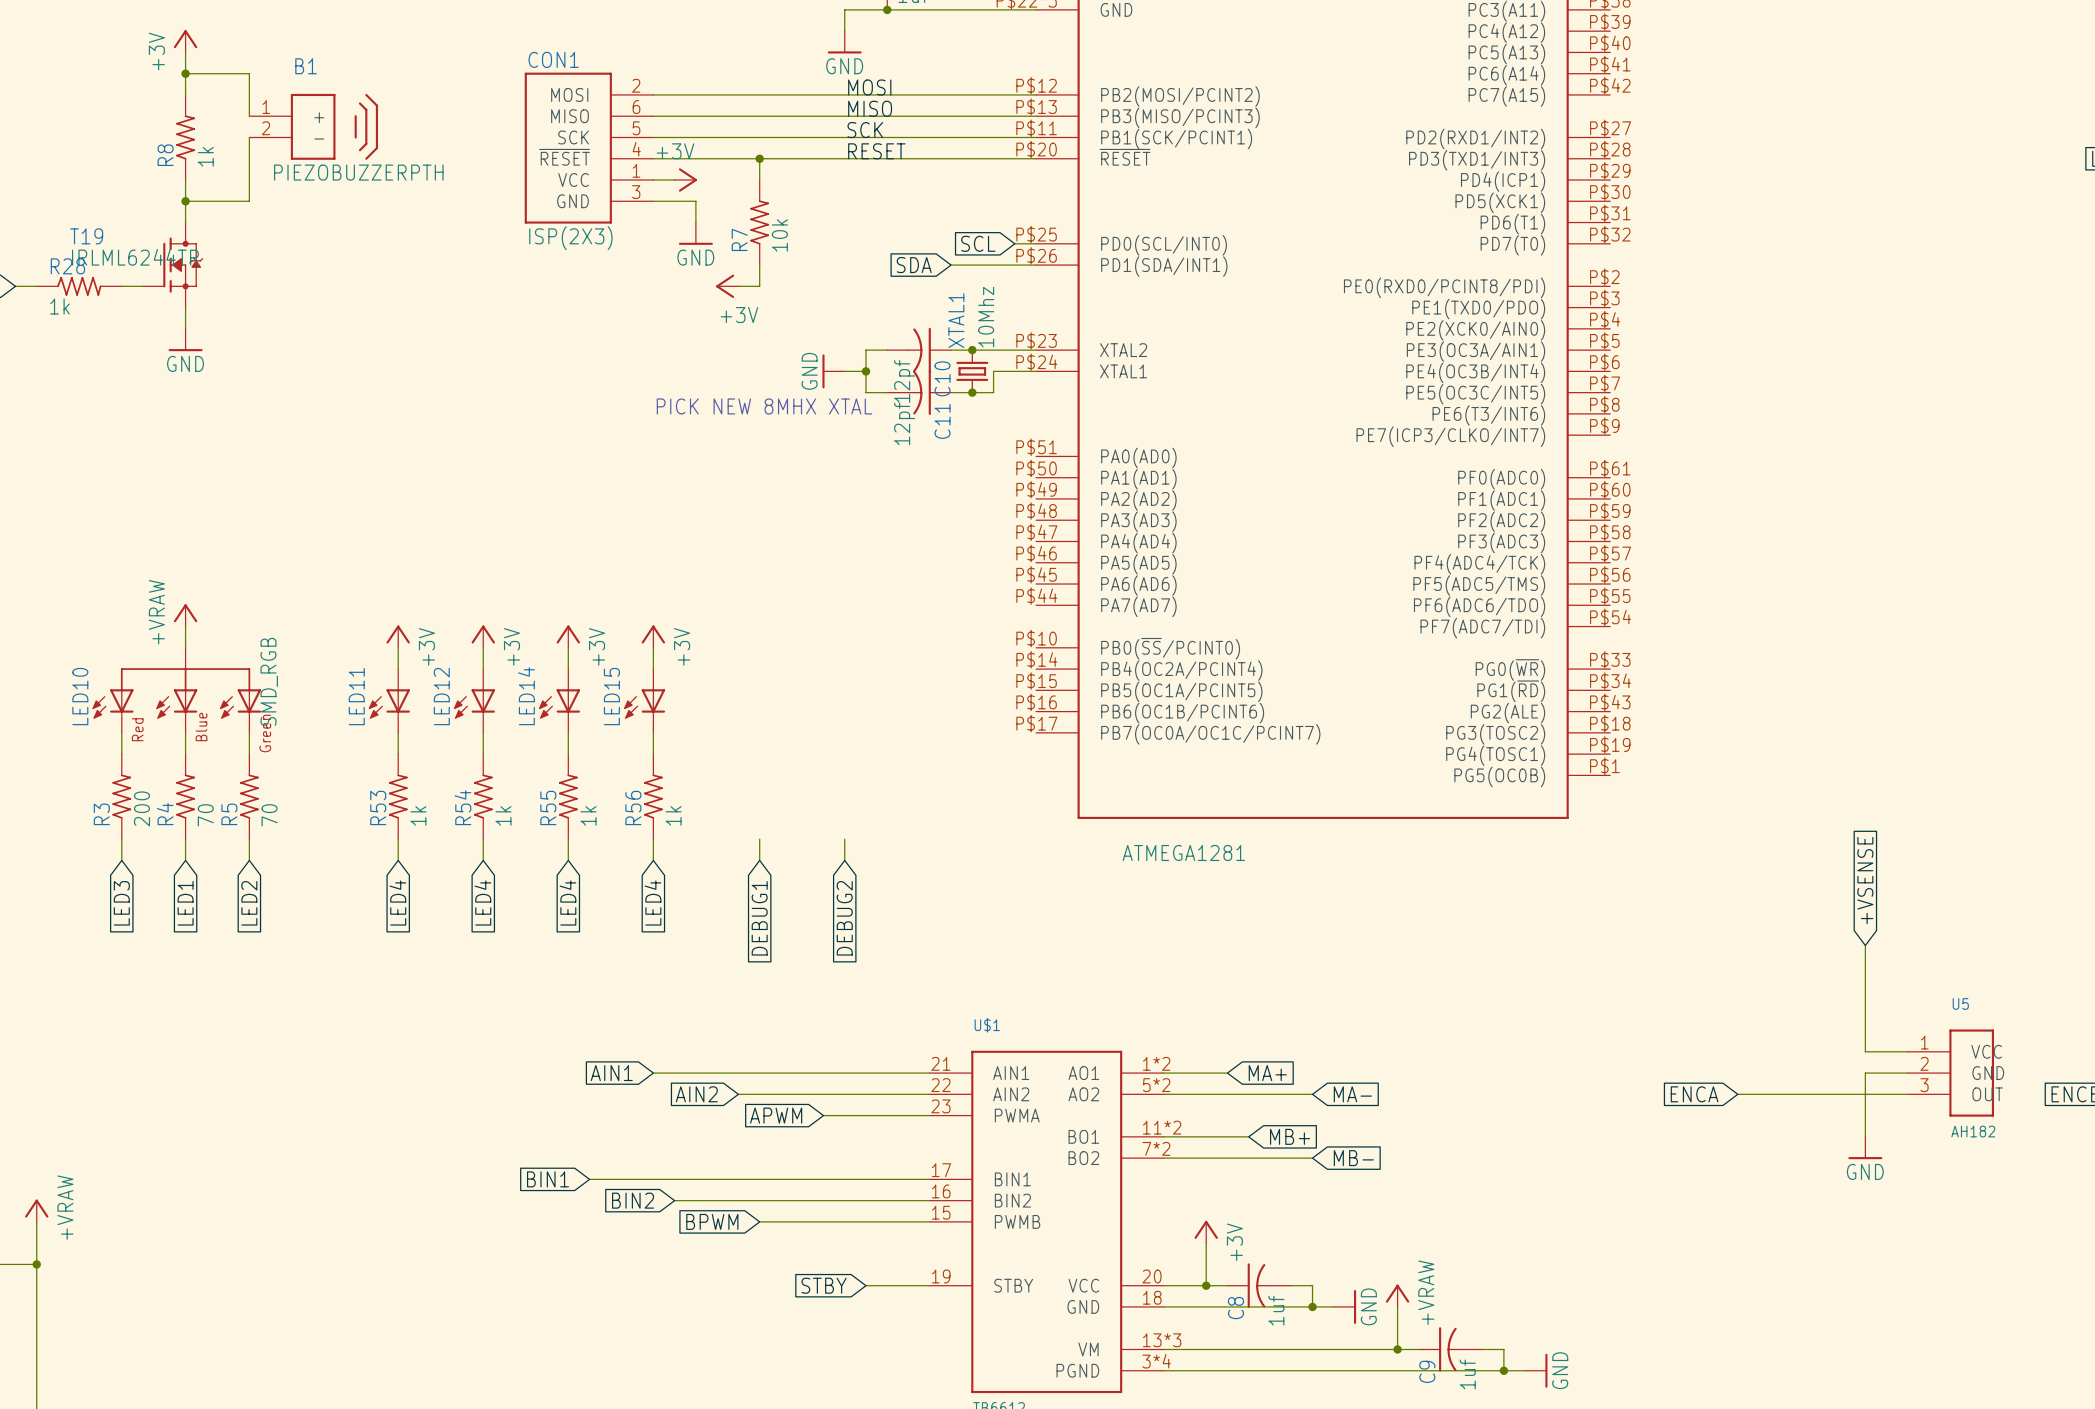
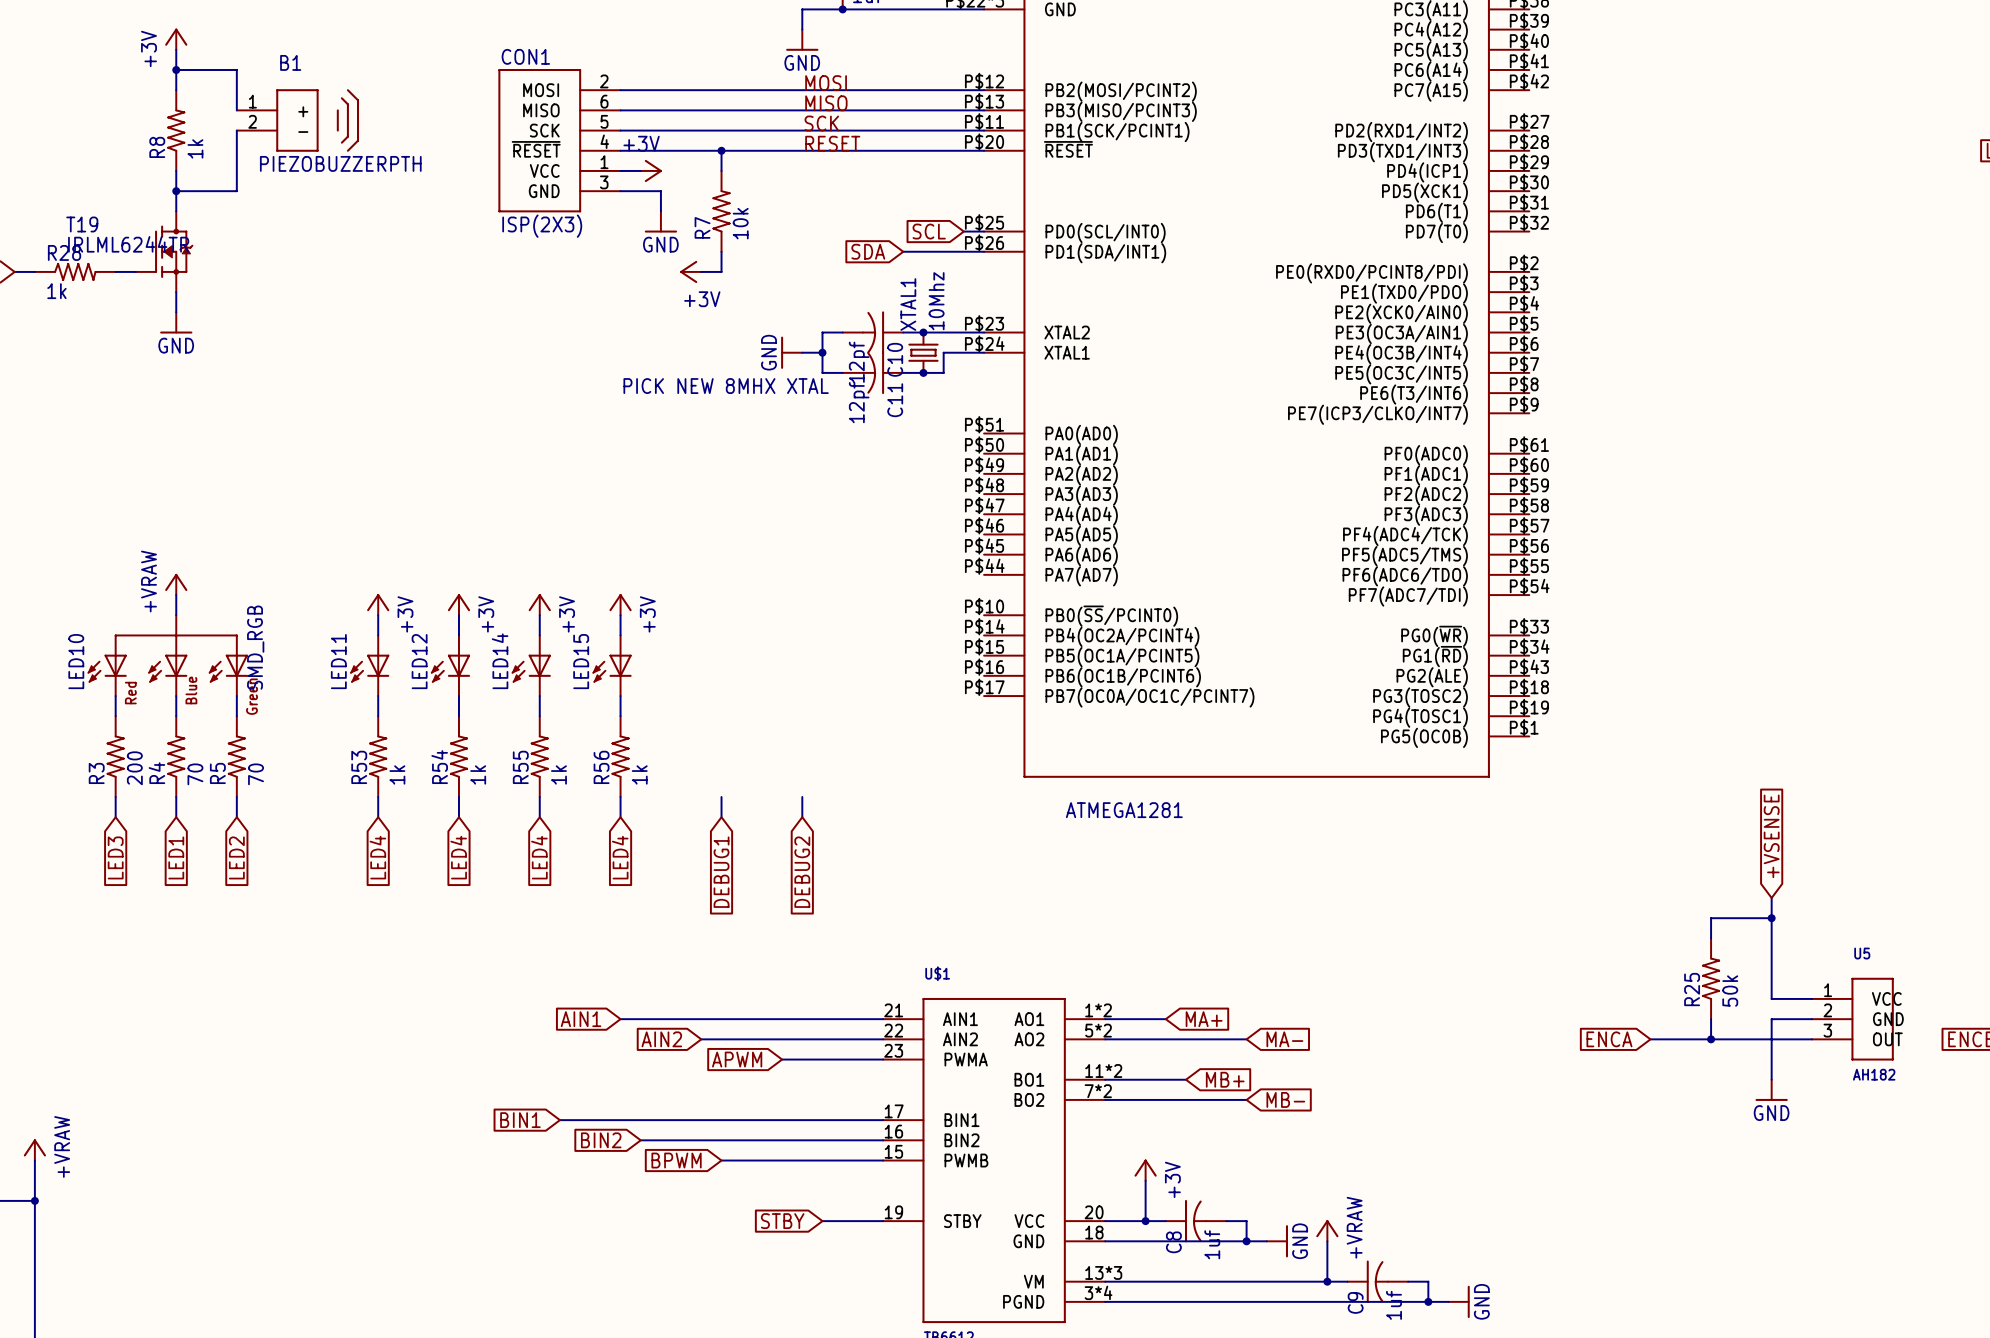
wire: none -> (1771, 918) (1711, 918) (1711, 938)
junction: none -> (1771, 918)
R25: none -> 50k (1711, 978)
wire: none -> (1711, 1019) (1711, 1039)
junction: none -> (1711, 1039)

